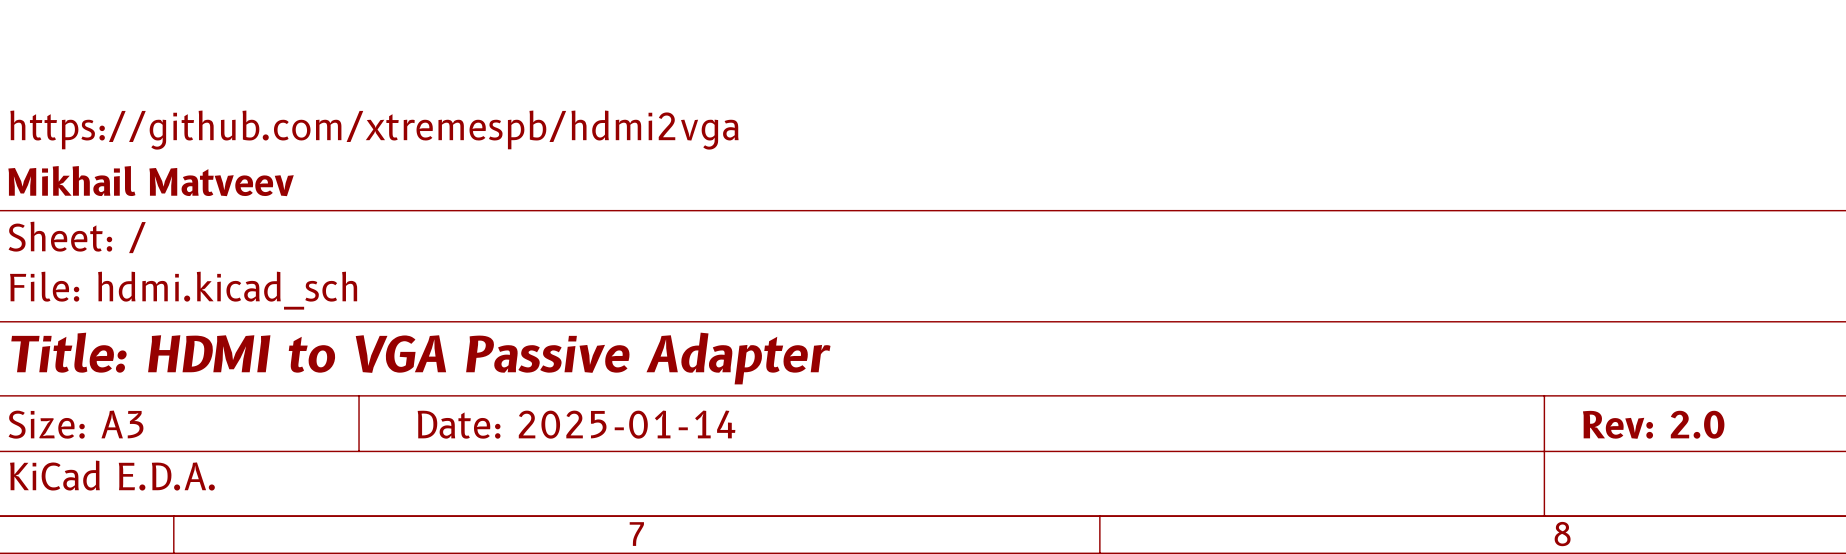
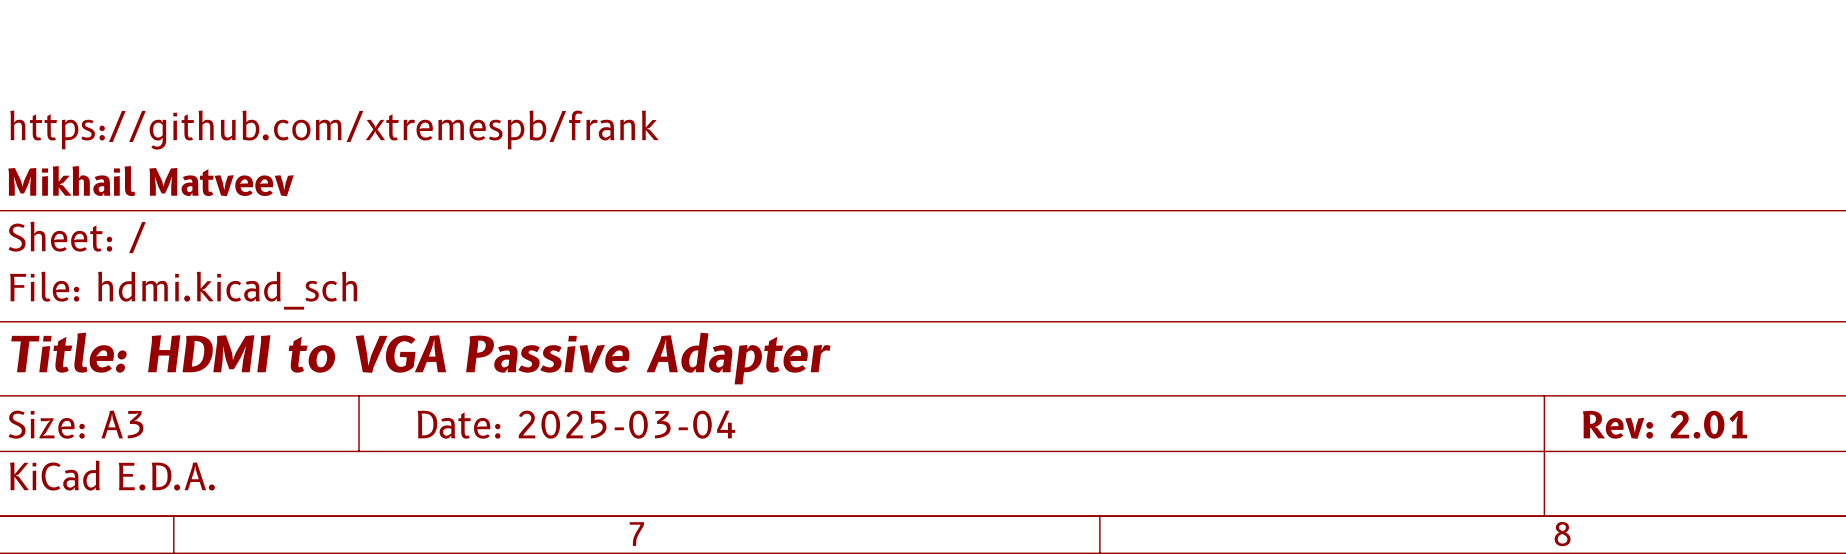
title block: https://github.com/xtremespb/hdmi2vga (374, 130) -> https://github.com/xtremespb/frank (334, 130)
title block: Date: 2025-01-14 (576, 424) -> Date: 2025-03-04 (576, 424)
title block: Rev: 2.0 (1653, 424) -> Rev: 2.01 (1665, 424)

